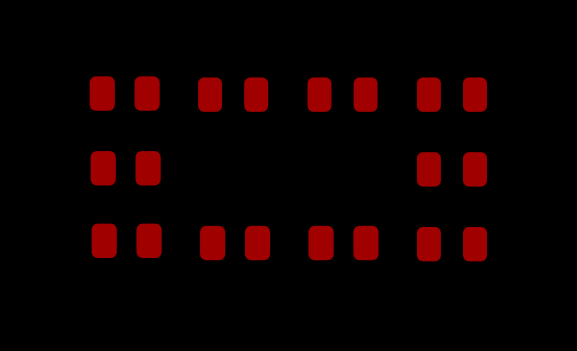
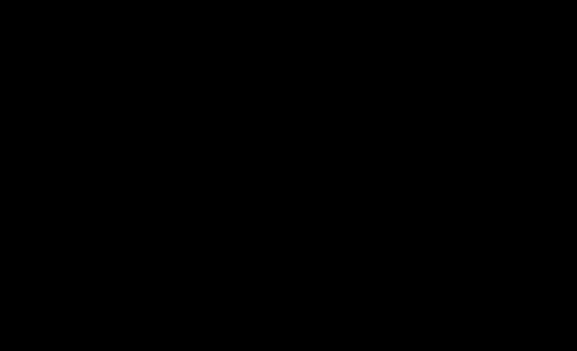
part: (124, 93) -> none
part: (233, 94) -> none
part: (342, 94) -> none
part: (451, 94) -> none
part: (125, 168) -> none
part: (451, 169) -> none
part: (126, 240) -> none
part: (235, 243) -> none
part: (343, 243) -> none
part: (451, 244) -> none

